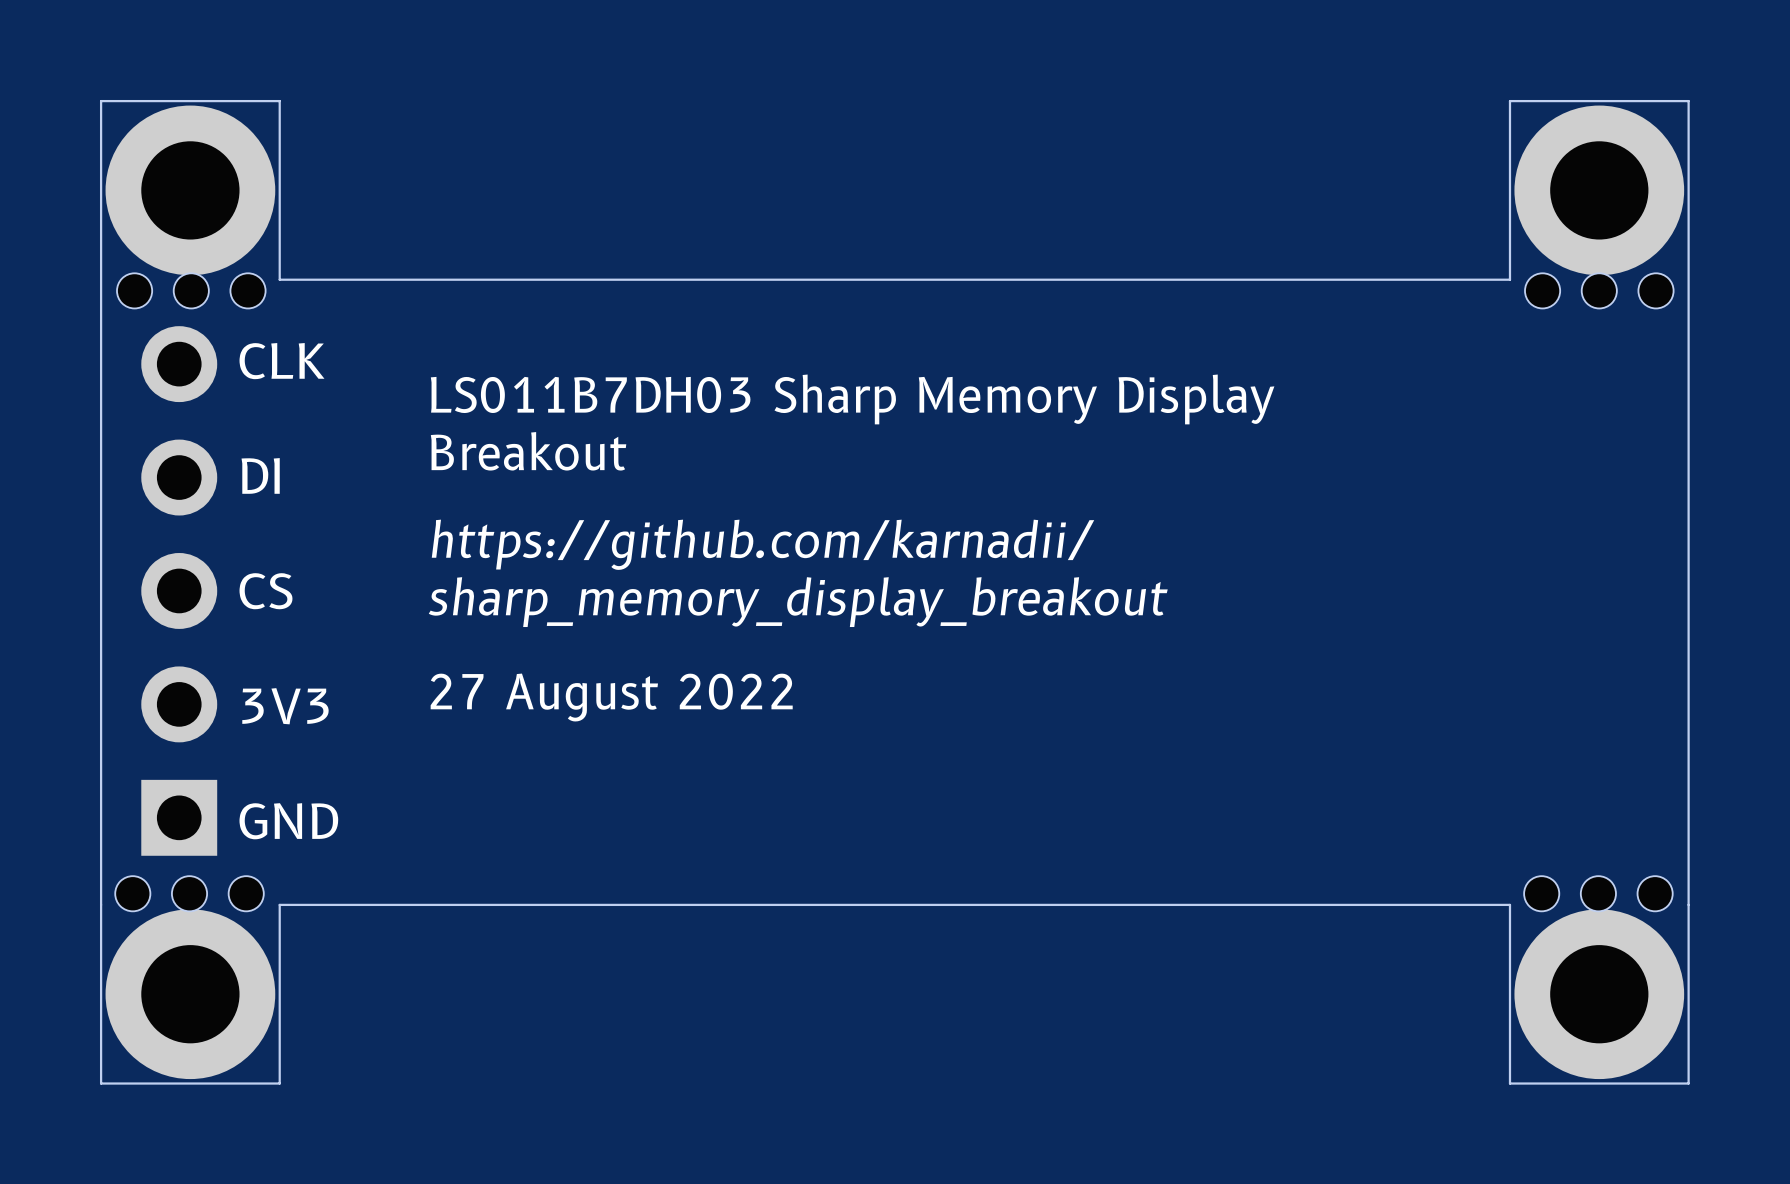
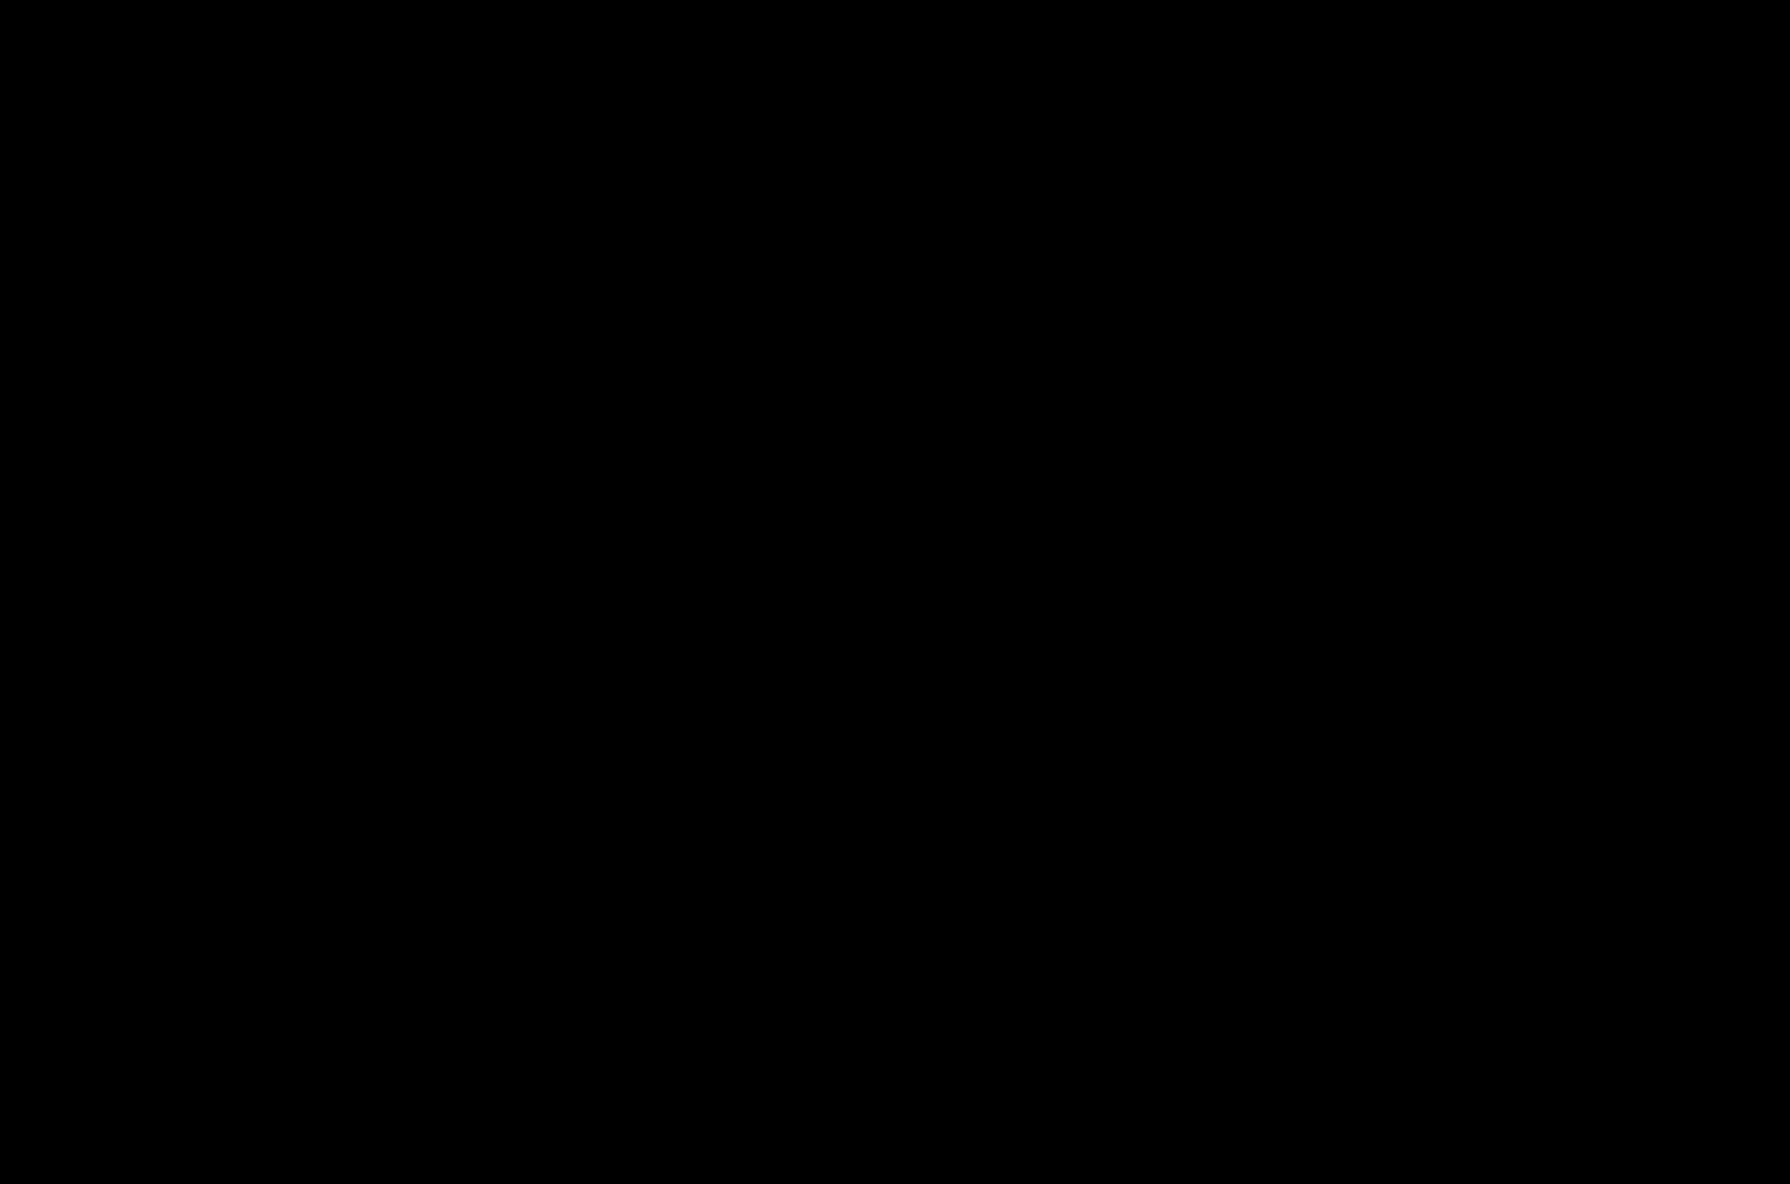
board edge: (101, 101) (279, 101) (279, 279) (1509, 279) (1509, 101) (1688, 101) (1688, 1083) (1509, 1083) (1509, 904) (279, 904) (279, 1083) (101, 1083) (101, 101) -> none
part: (190, 190) -> none
part: (1599, 190) -> none
part: (191, 290) -> none
part: (1599, 290) -> none
text: CLK (281, 361) -> none
text: LS011B7DH03 Sharp Memory Display (852, 399) -> none
text: Breakout (528, 451) -> none
text: DI (260, 475) -> none
text: https://github.com/karnadii/ (763, 544) -> none
part: (179, 590) -> none
text: CS (265, 591) -> none
text: sharp_memory_display_breakout (798, 602) -> none
text: 27 August 2022 (611, 697) -> none
text: 3V3 (285, 706) -> none
text: GND (288, 821) -> none
part: (189, 893) -> none
part: (1598, 893) -> none
part: (190, 994) -> none
part: (1599, 994) -> none

